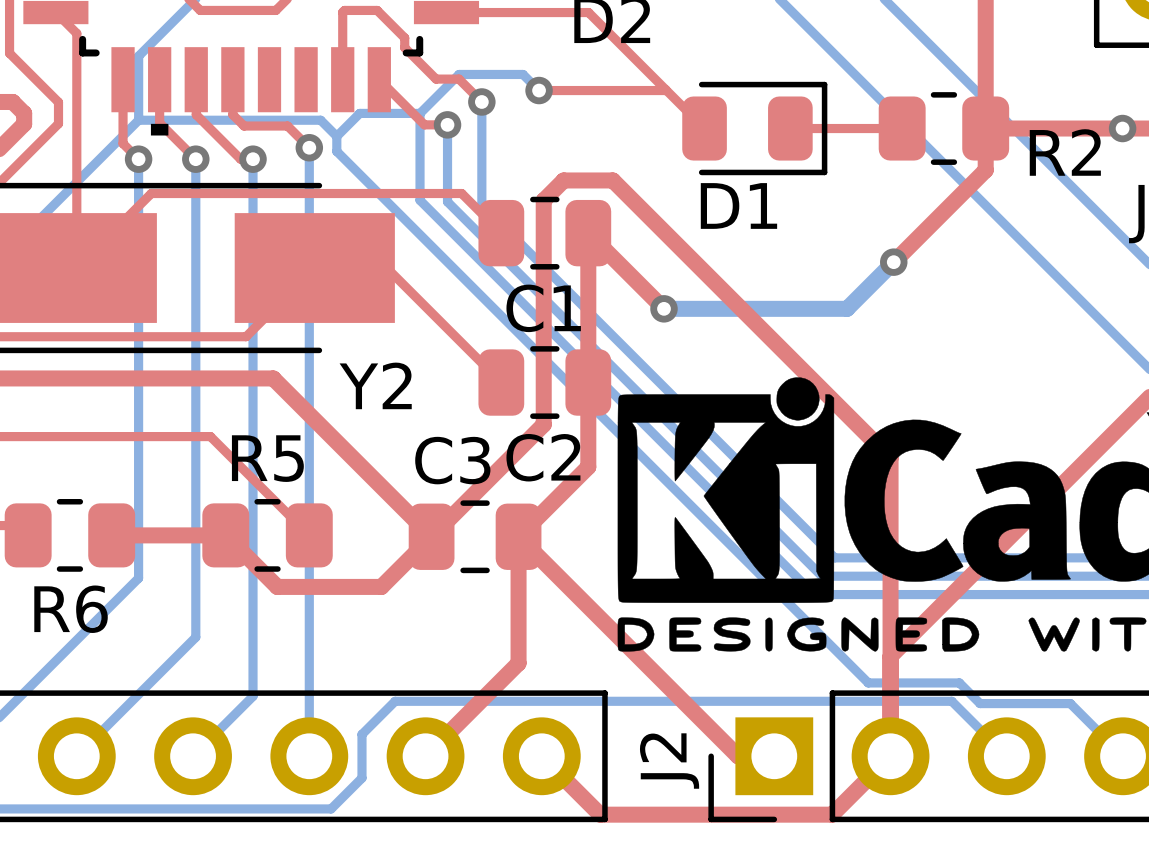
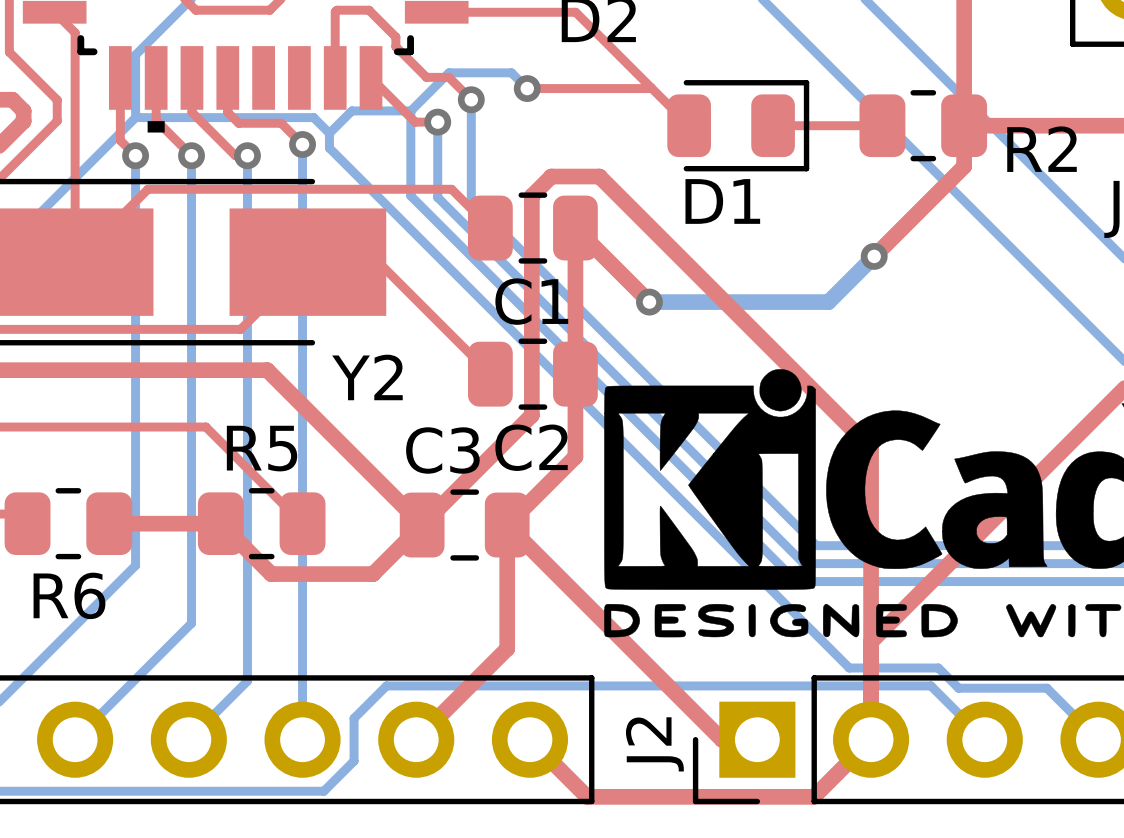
via: (1122, 128) -> none

